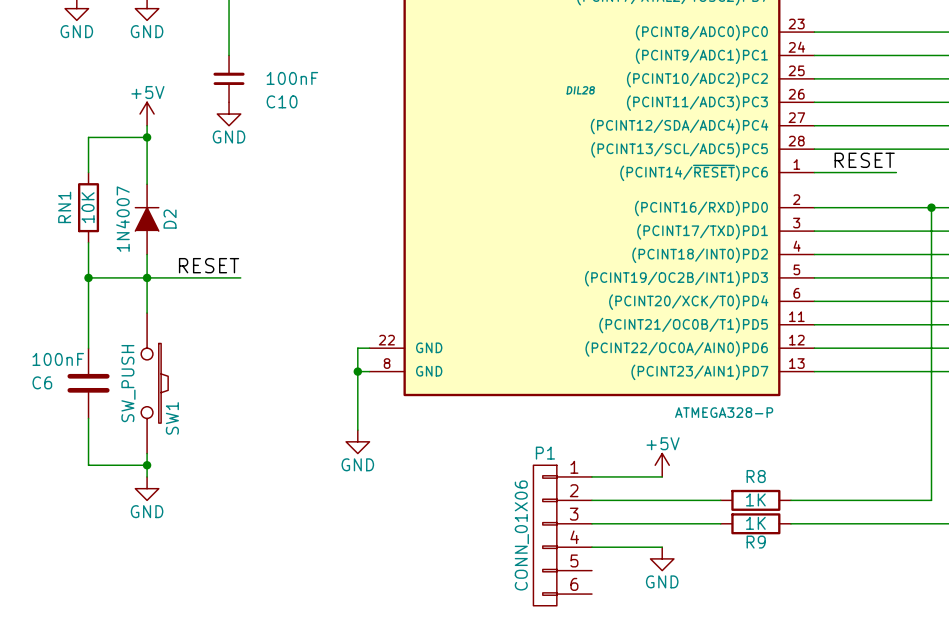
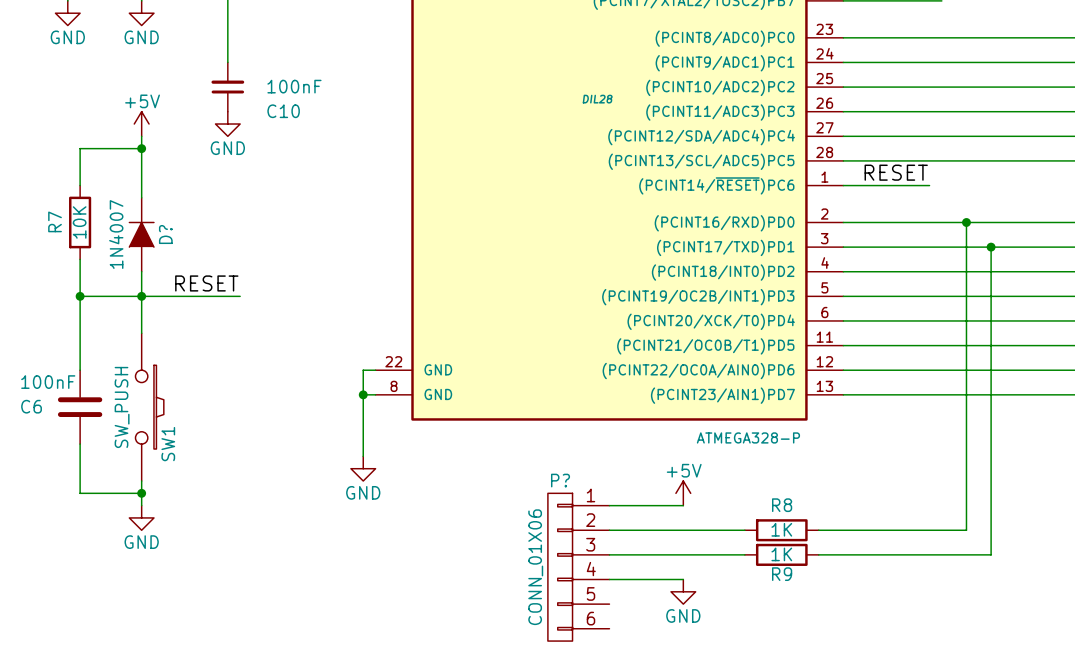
RN1 name: RN1 (64, 207) -> R7 (55, 221)
D2 name: D2 (170, 219) -> D? (165, 234)
P1 name: P1 (545, 453) -> P? (560, 480)

